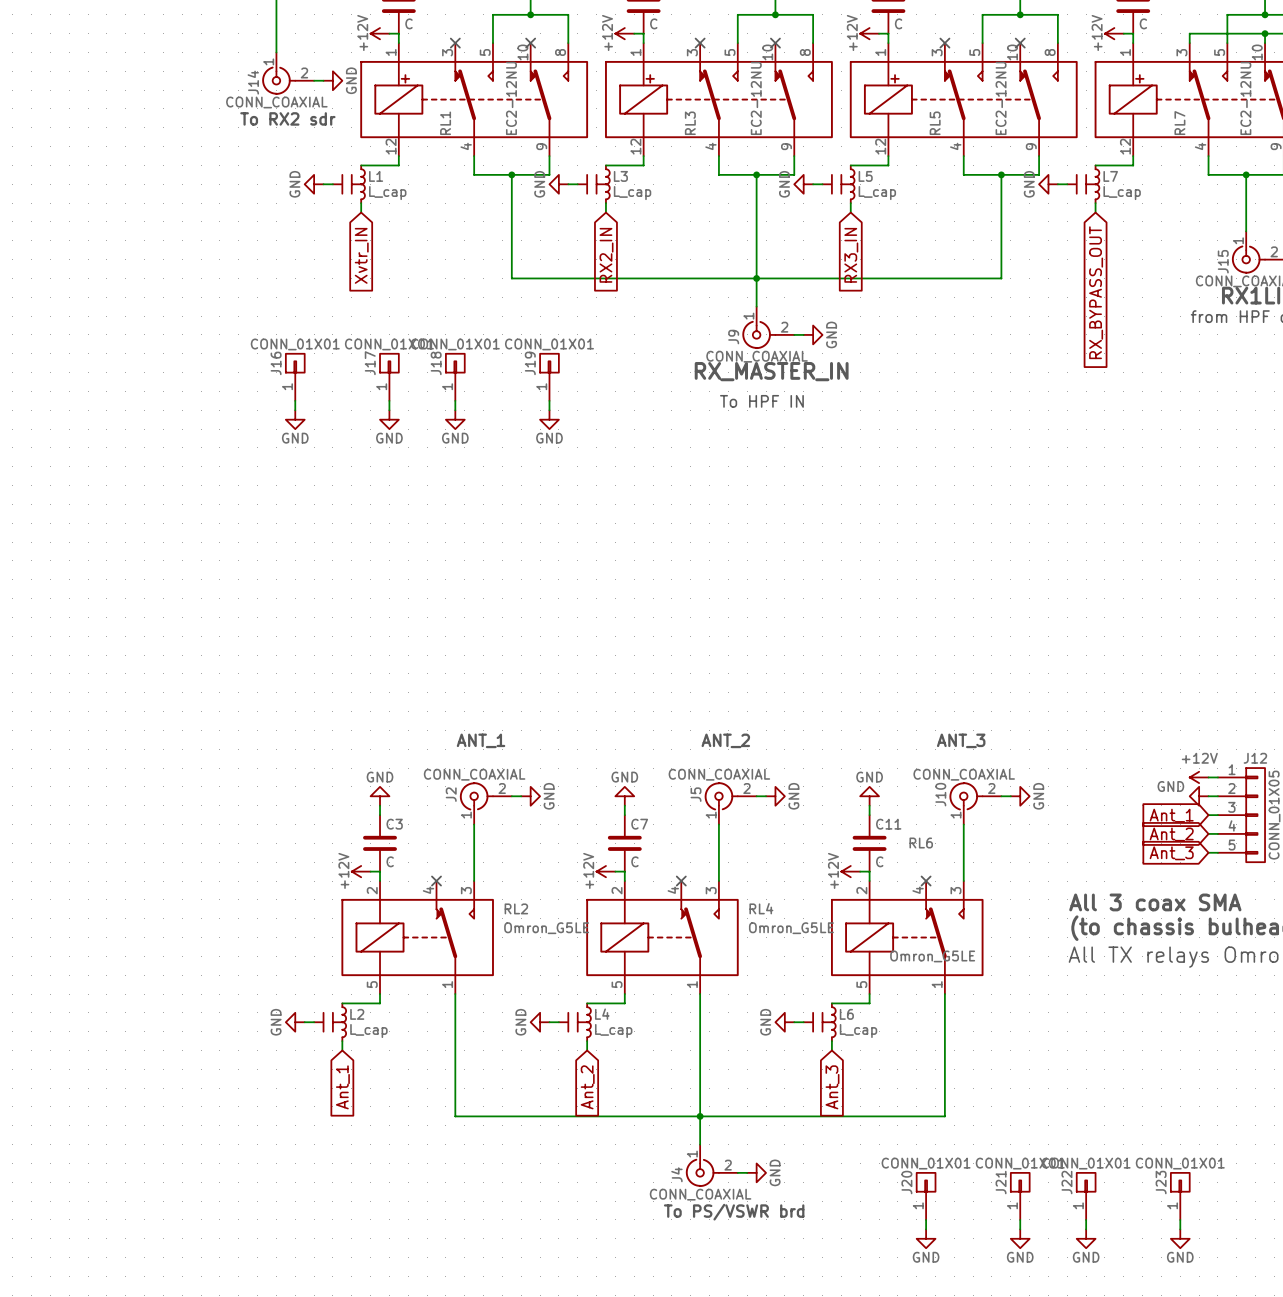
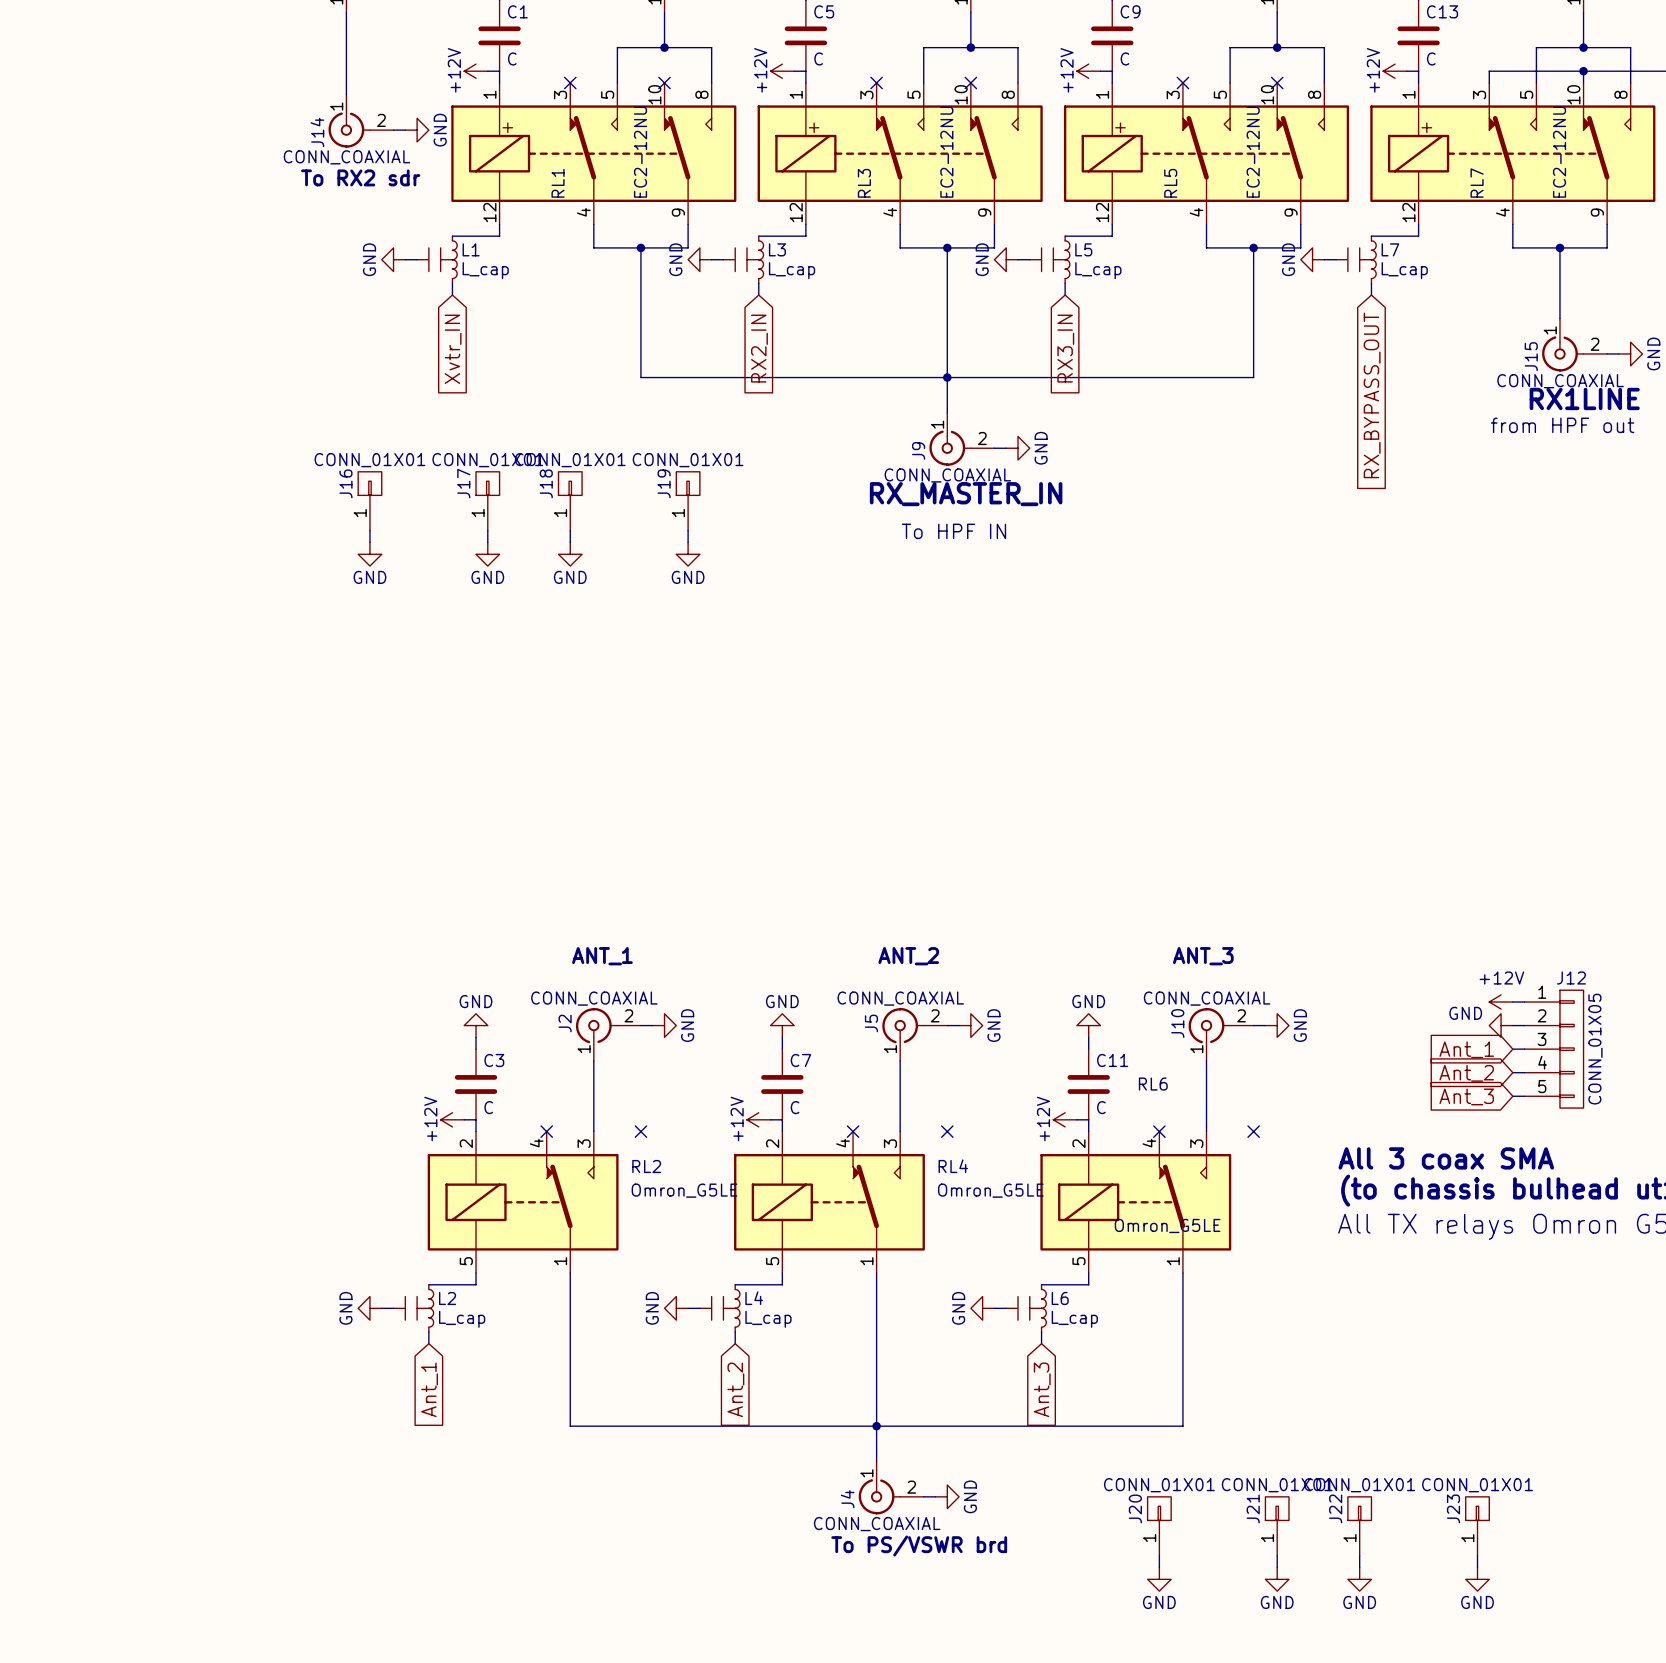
no-connect mark: none -> (640, 1131)
no-connect mark: none -> (947, 1131)
no-connect mark: none -> (1253, 1131)

